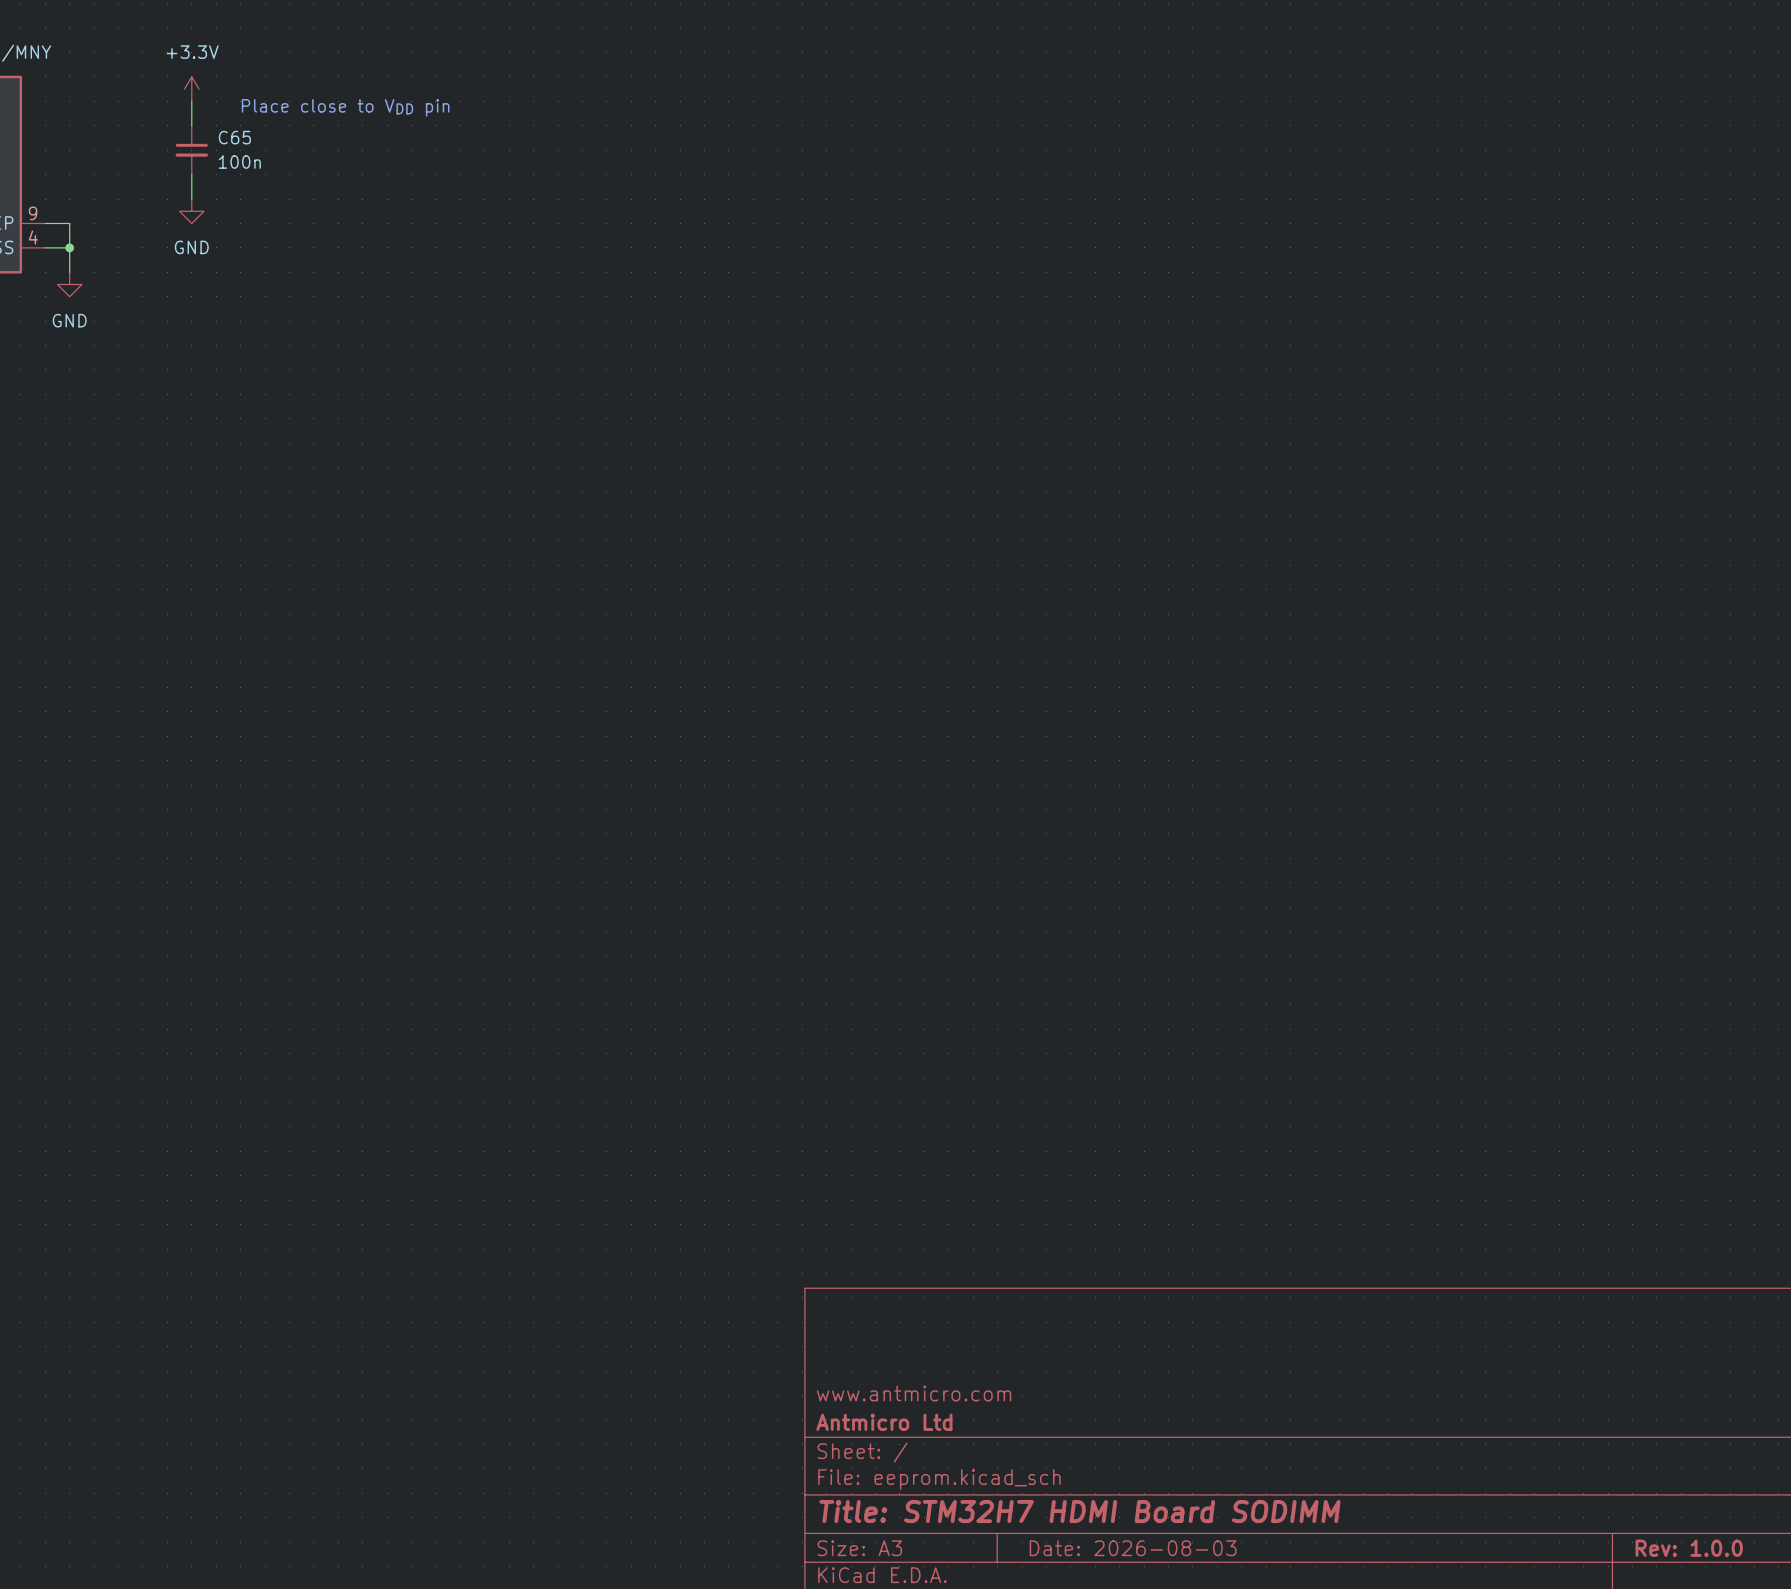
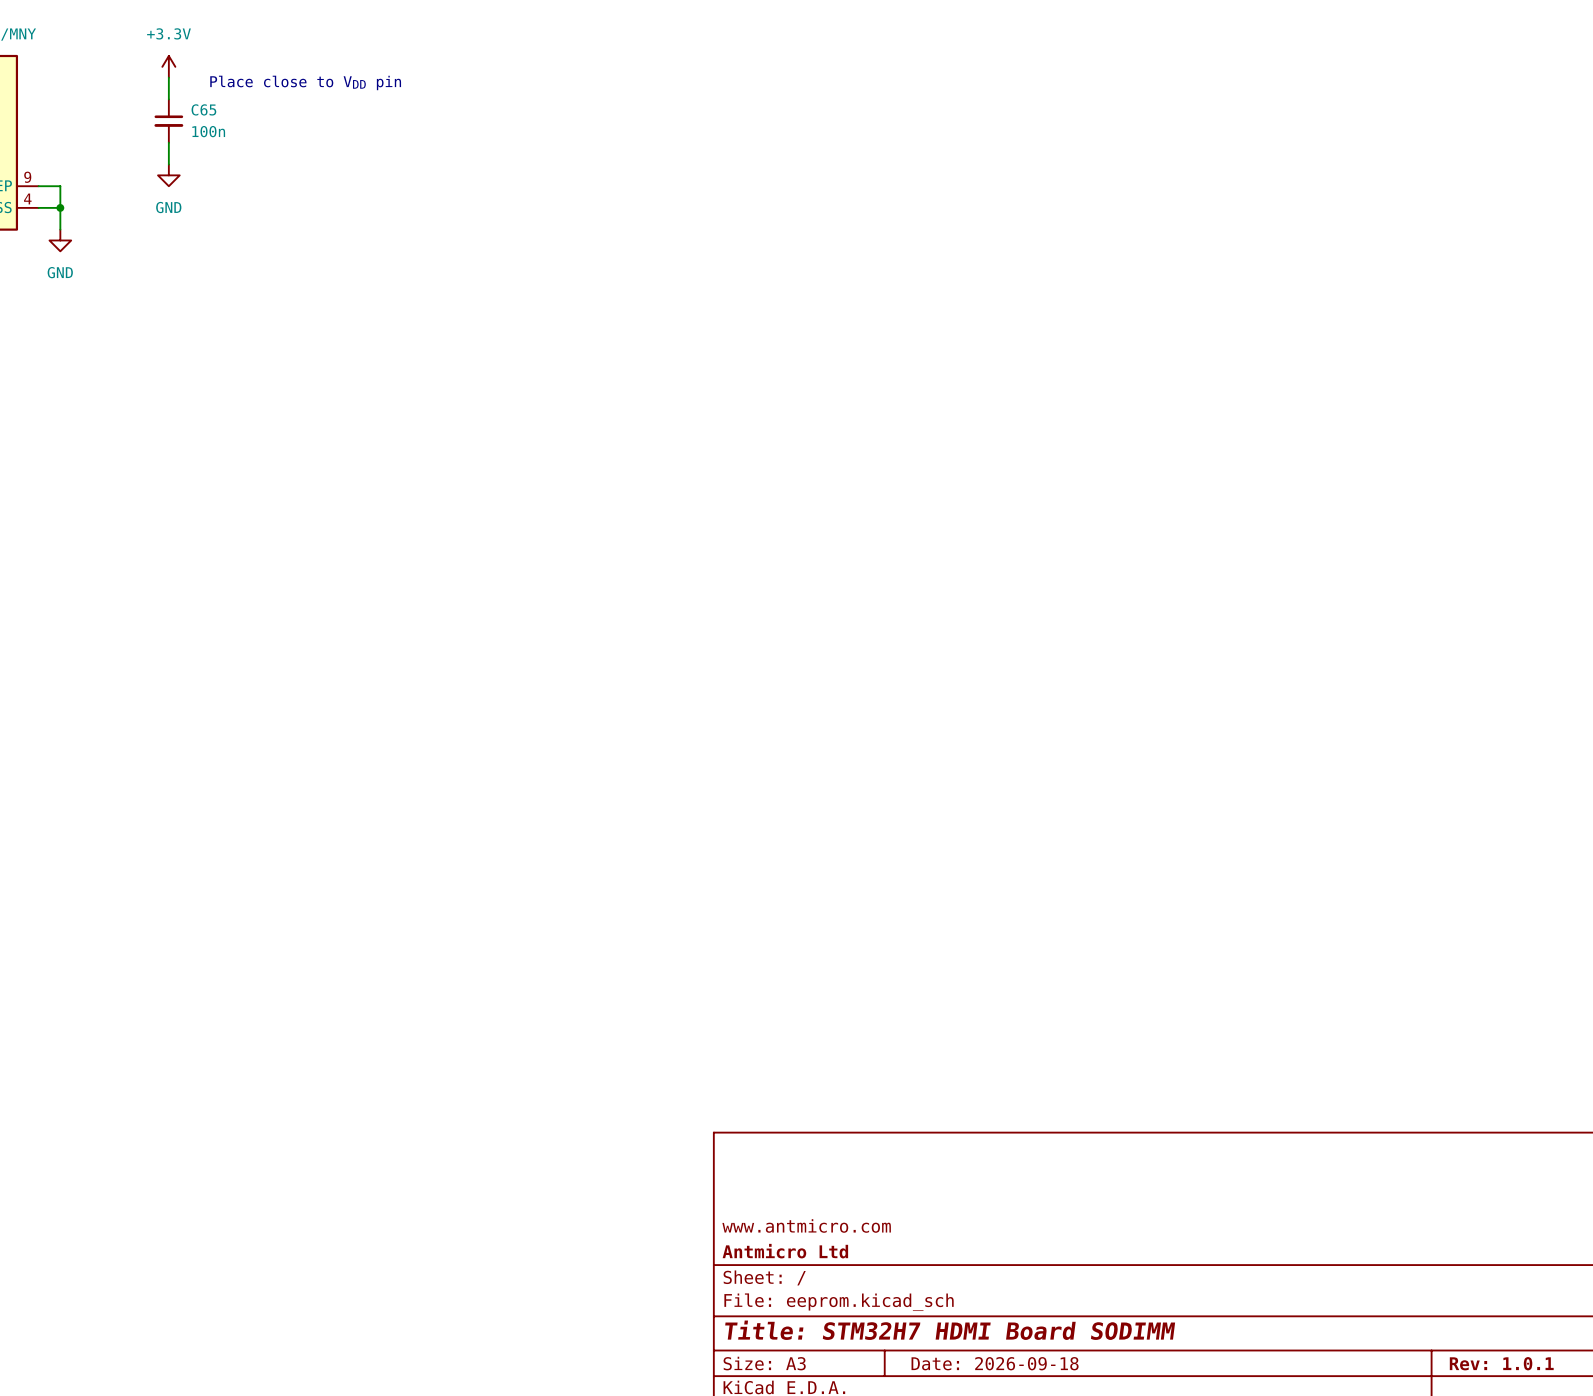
title block: Date: 2026-08-03 (1133, 1548) -> Date: 2026-09-18 (995, 1363)
title block: Rev: 1.0.0 (1689, 1548) -> Rev: 1.0.1 (1501, 1363)

